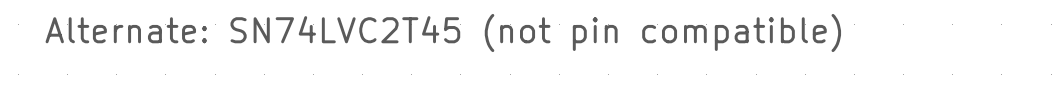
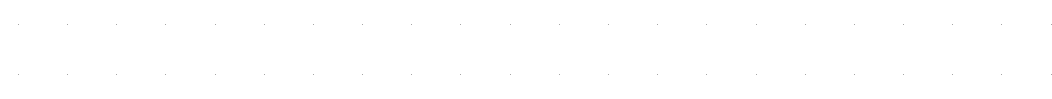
text: Alternate: SN74LVC2T45 (not pin compatible) (443, 33) -> none

